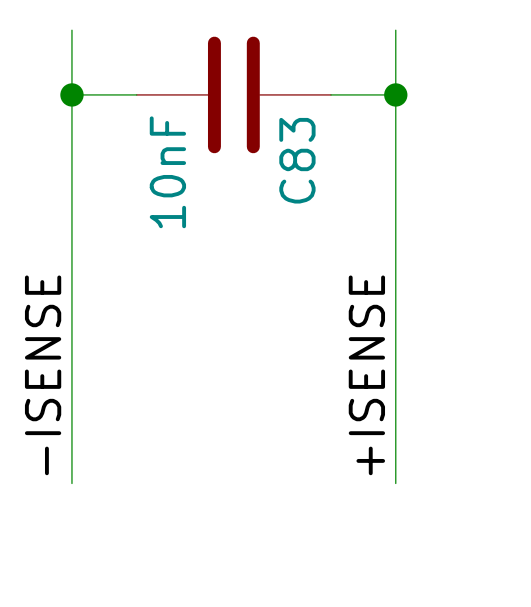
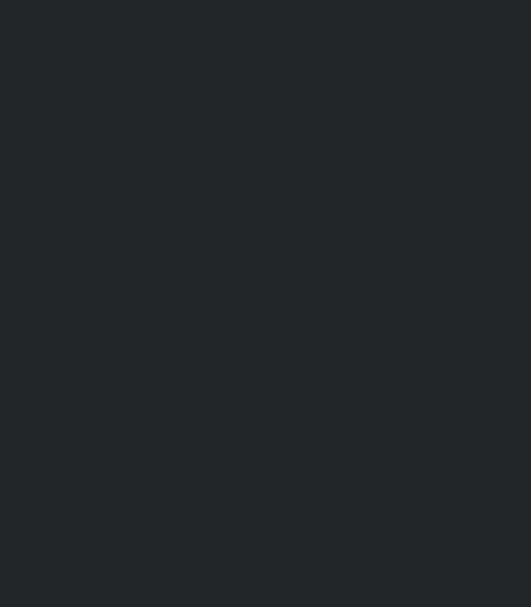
wire: (71, 30) (71, 483) -> none
wire: (395, 30) (395, 483) -> none
wire: (71, 94) (136, 94) -> none
junction: (71, 94) -> none
C83: 10nF (233, 94) -> none
wire: (331, 94) (395, 94) -> none
junction: (395, 94) -> none
label: -ISENSE (43, 375) -> none
label: +ISENSE (366, 375) -> none

